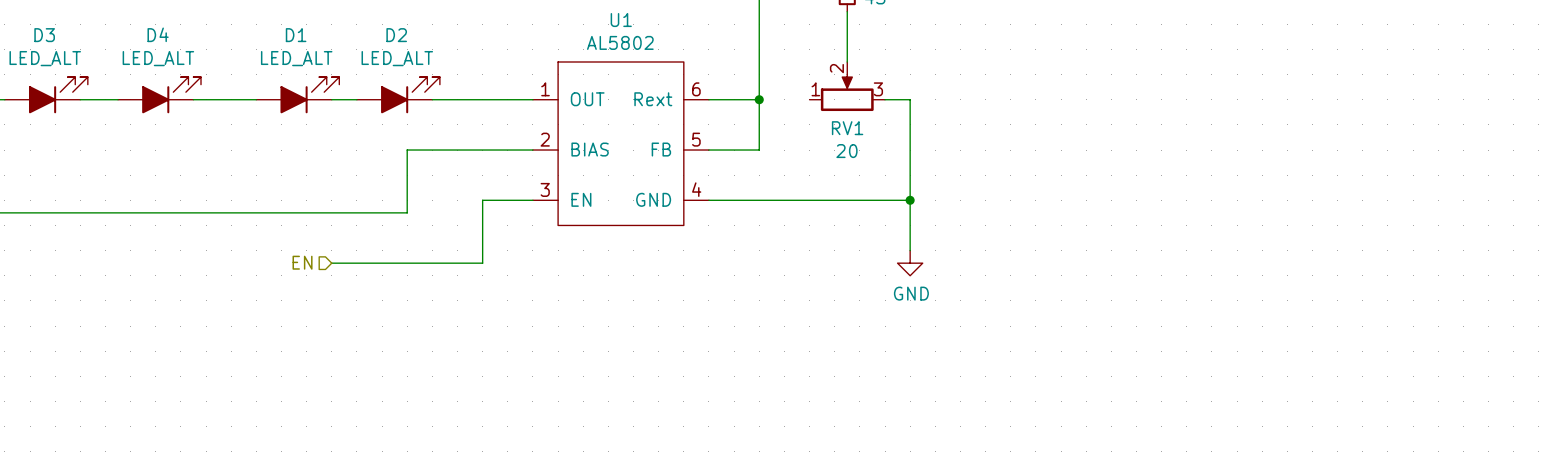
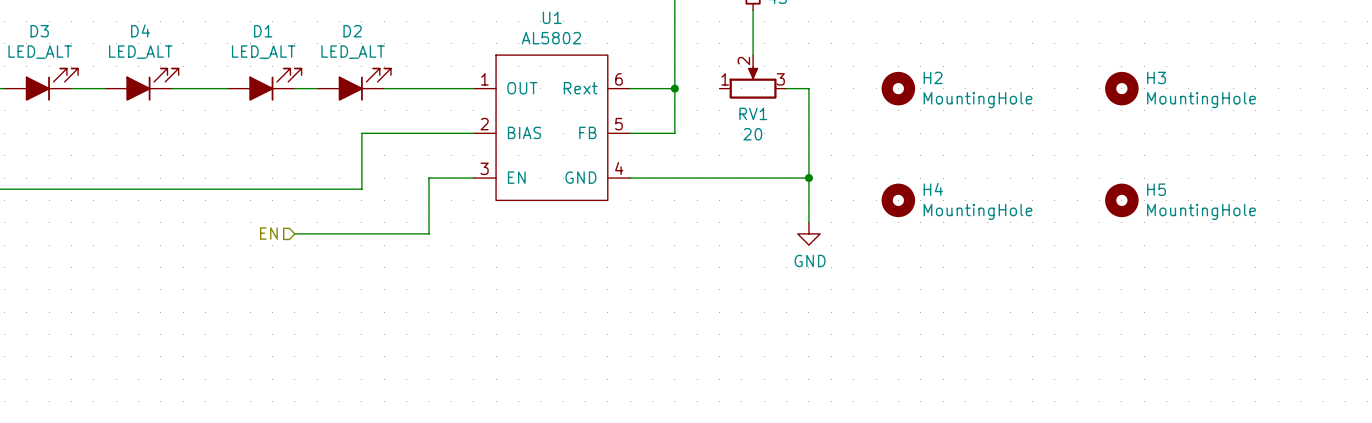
H2: none -> MountingHole (898, 88)
H3: none -> MountingHole (1121, 88)
H4: none -> MountingHole (898, 200)
H5: none -> MountingHole (1121, 200)

